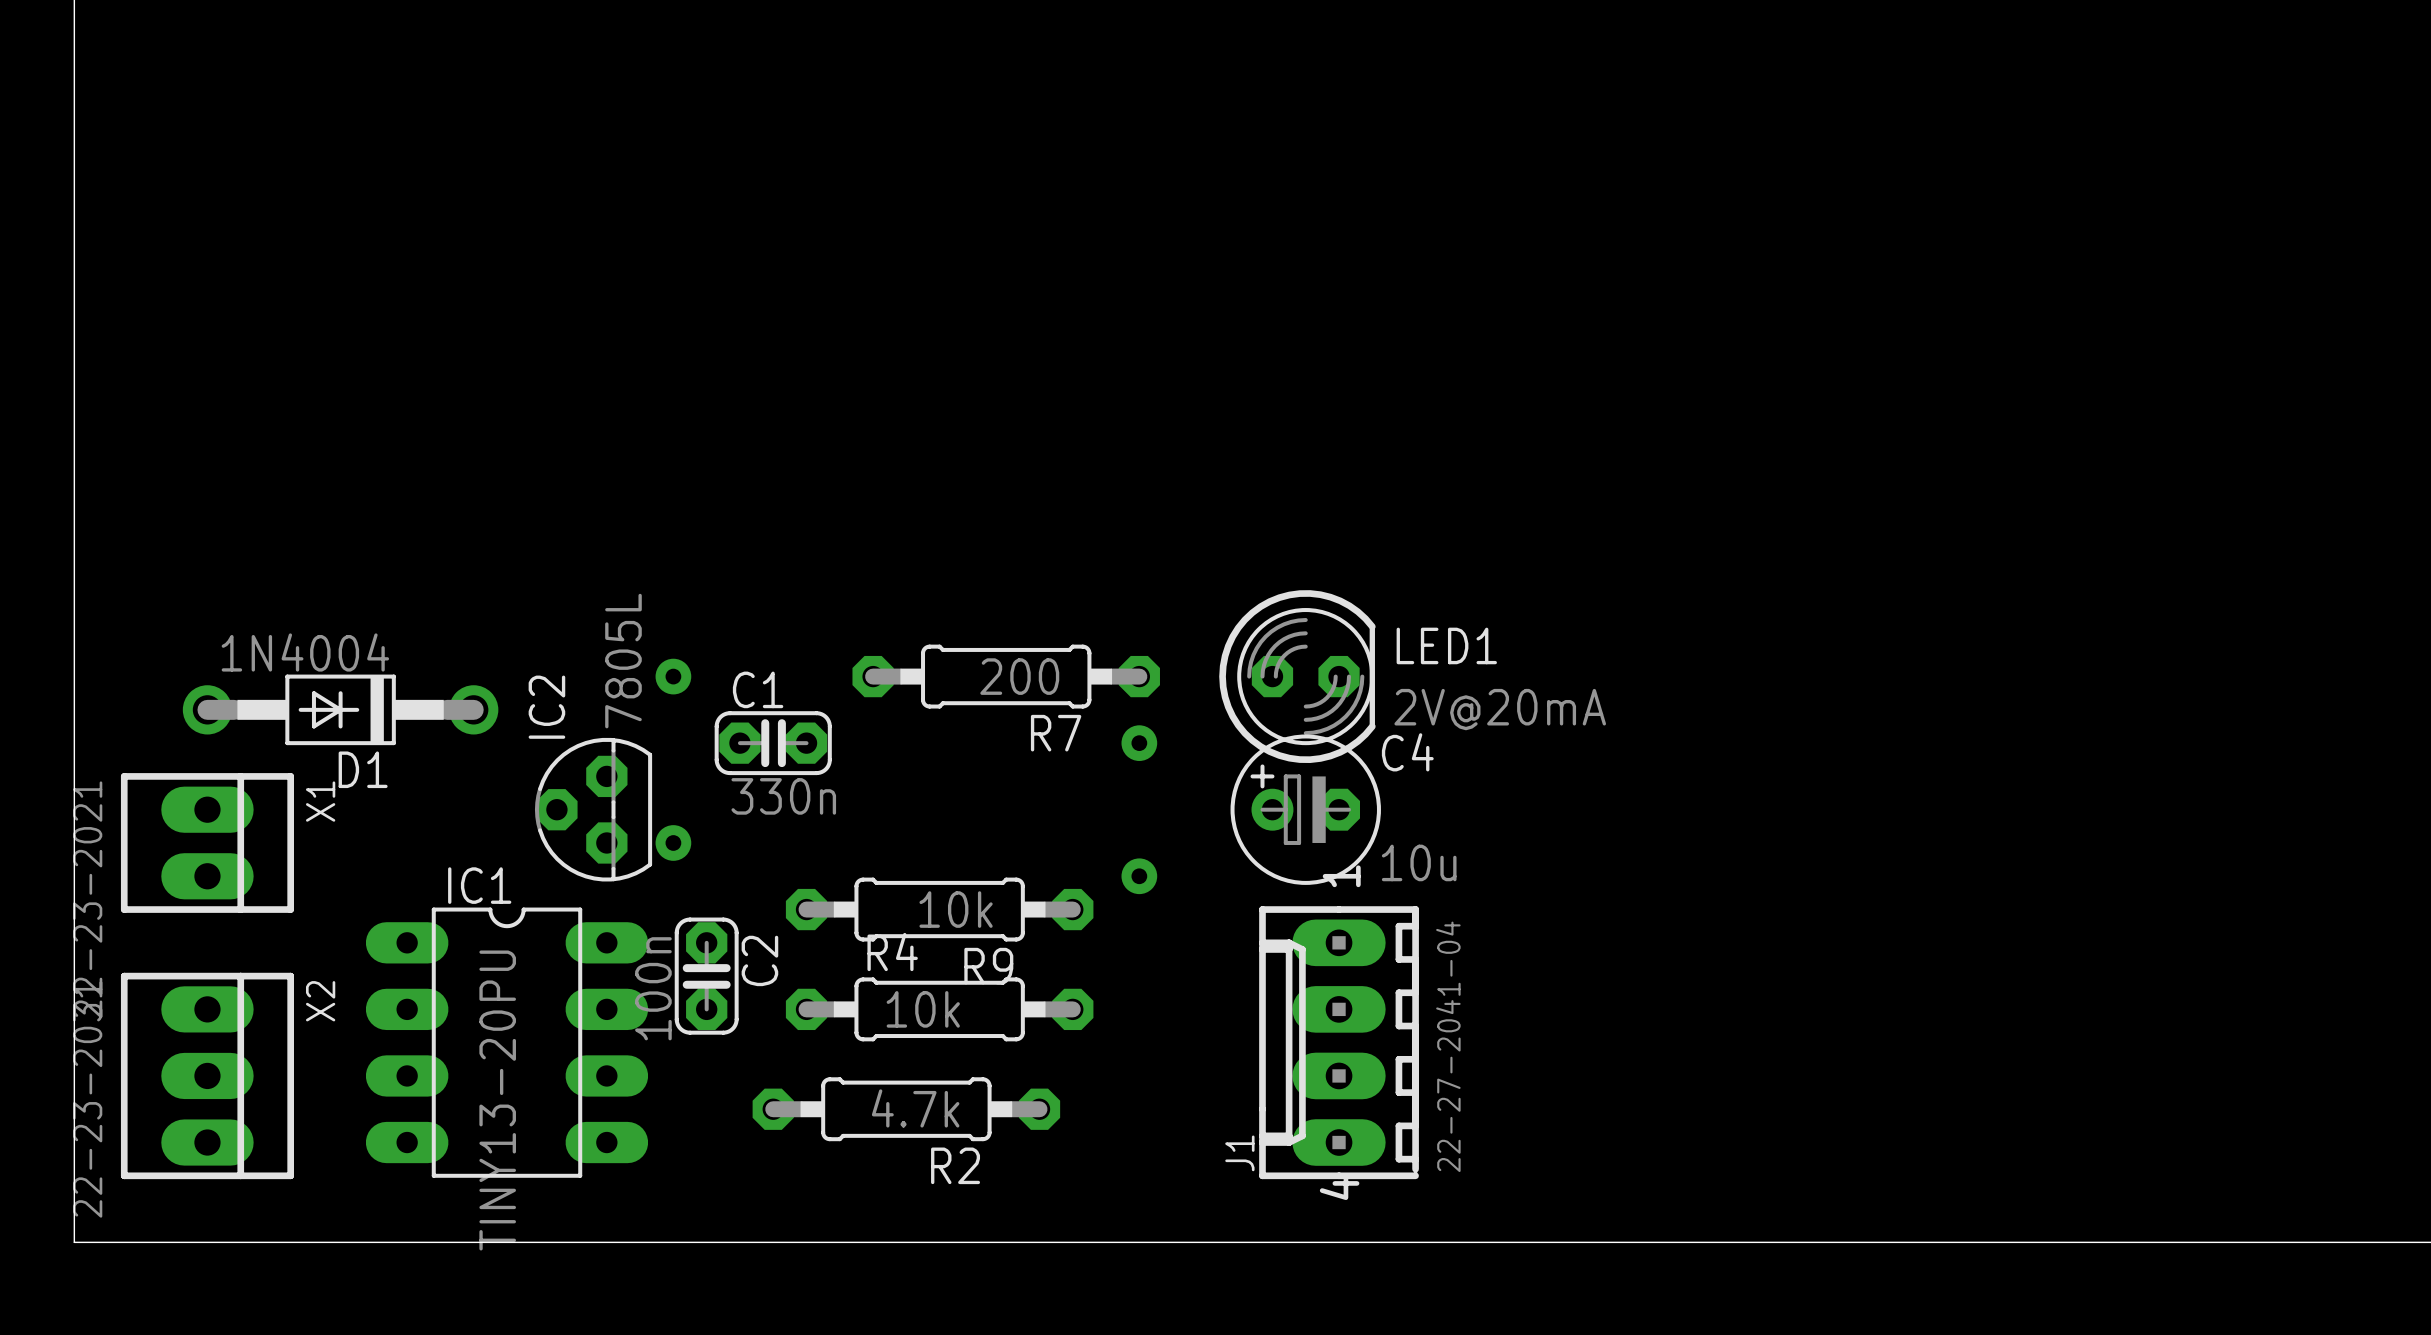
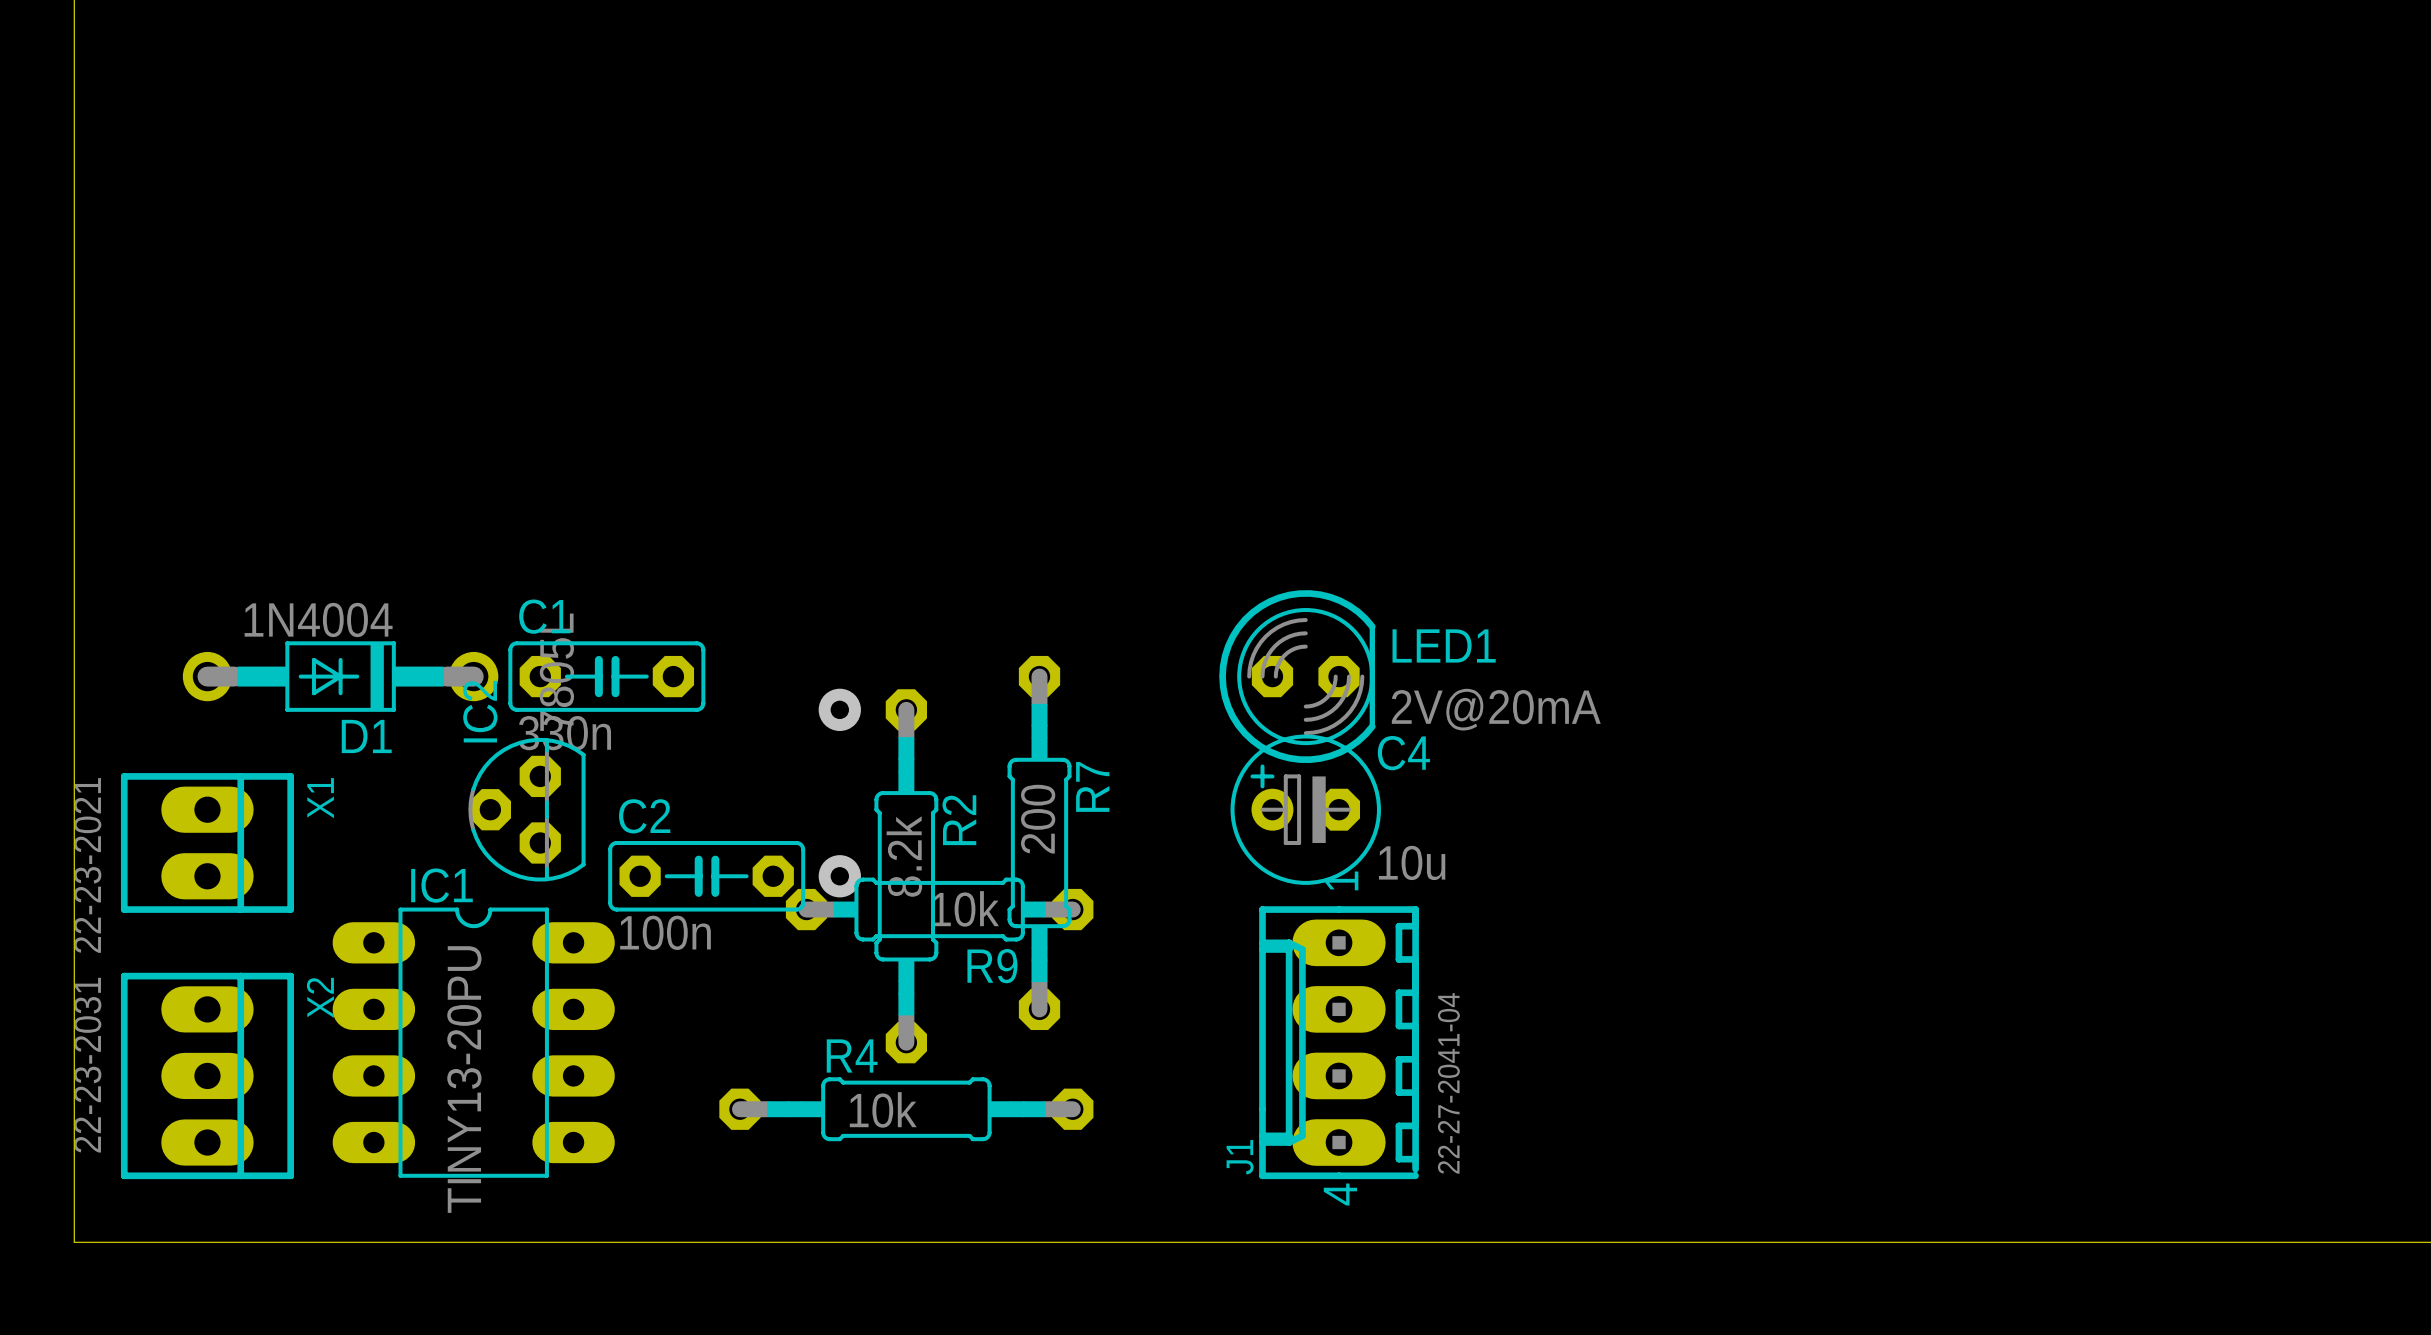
R7 footprint: [852, 644, 1160, 709] -> [1007, 655, 1072, 1031]
via: (673, 676) -> none
D1 position: (340, 709) -> (340, 676)
via: none -> (839, 709)
C1 footprint: [714, 711, 832, 776] -> [508, 641, 706, 712]
R7 name position: R7 (1056, 733) -> R7 (1092, 786)
via: (1139, 743) -> none
IC2 position: (593, 809) -> (526, 809)
via: (673, 842) -> none
via: none -> (839, 876)
via: (1139, 876) -> none
C2 footprint: [674, 917, 739, 1035] -> [608, 840, 806, 912]
C2 name position: C2 (759, 960) -> C2 (644, 816)
R4 footprint: [785, 977, 1094, 1042] -> [719, 1077, 1094, 1142]
IC1 position: (507, 1042) -> (473, 1042)
R2 footprint: [752, 1077, 1061, 1142] -> [874, 689, 939, 1064]
R2 value: 4.7k (915, 1108) -> 8.2k (904, 856)
R2 name position: R2 (955, 1165) -> R2 (959, 820)

